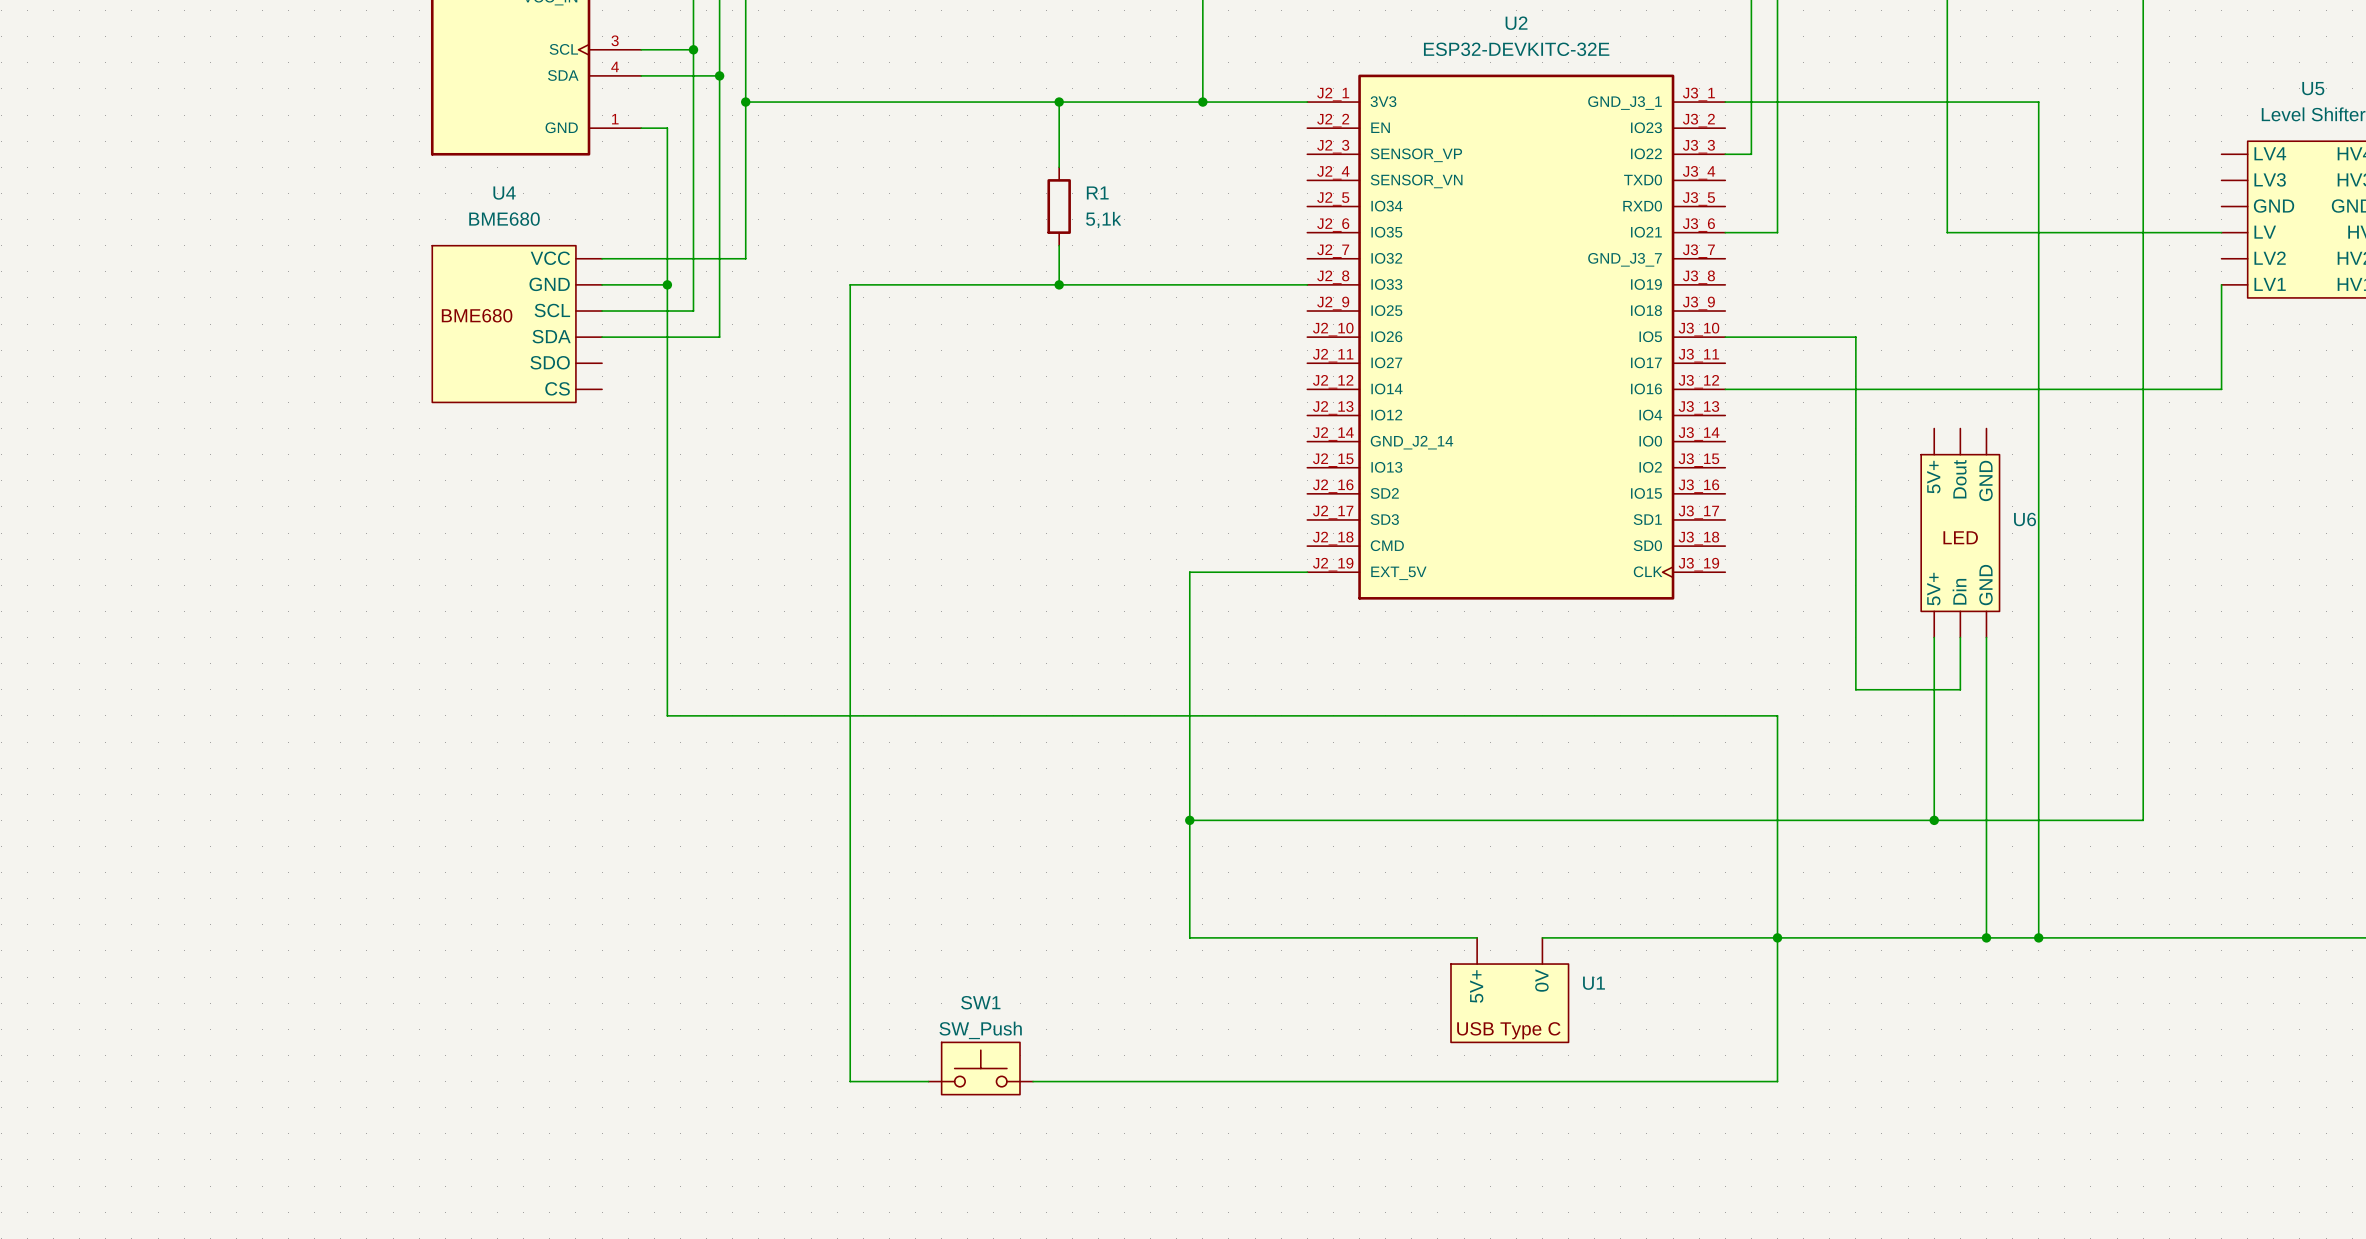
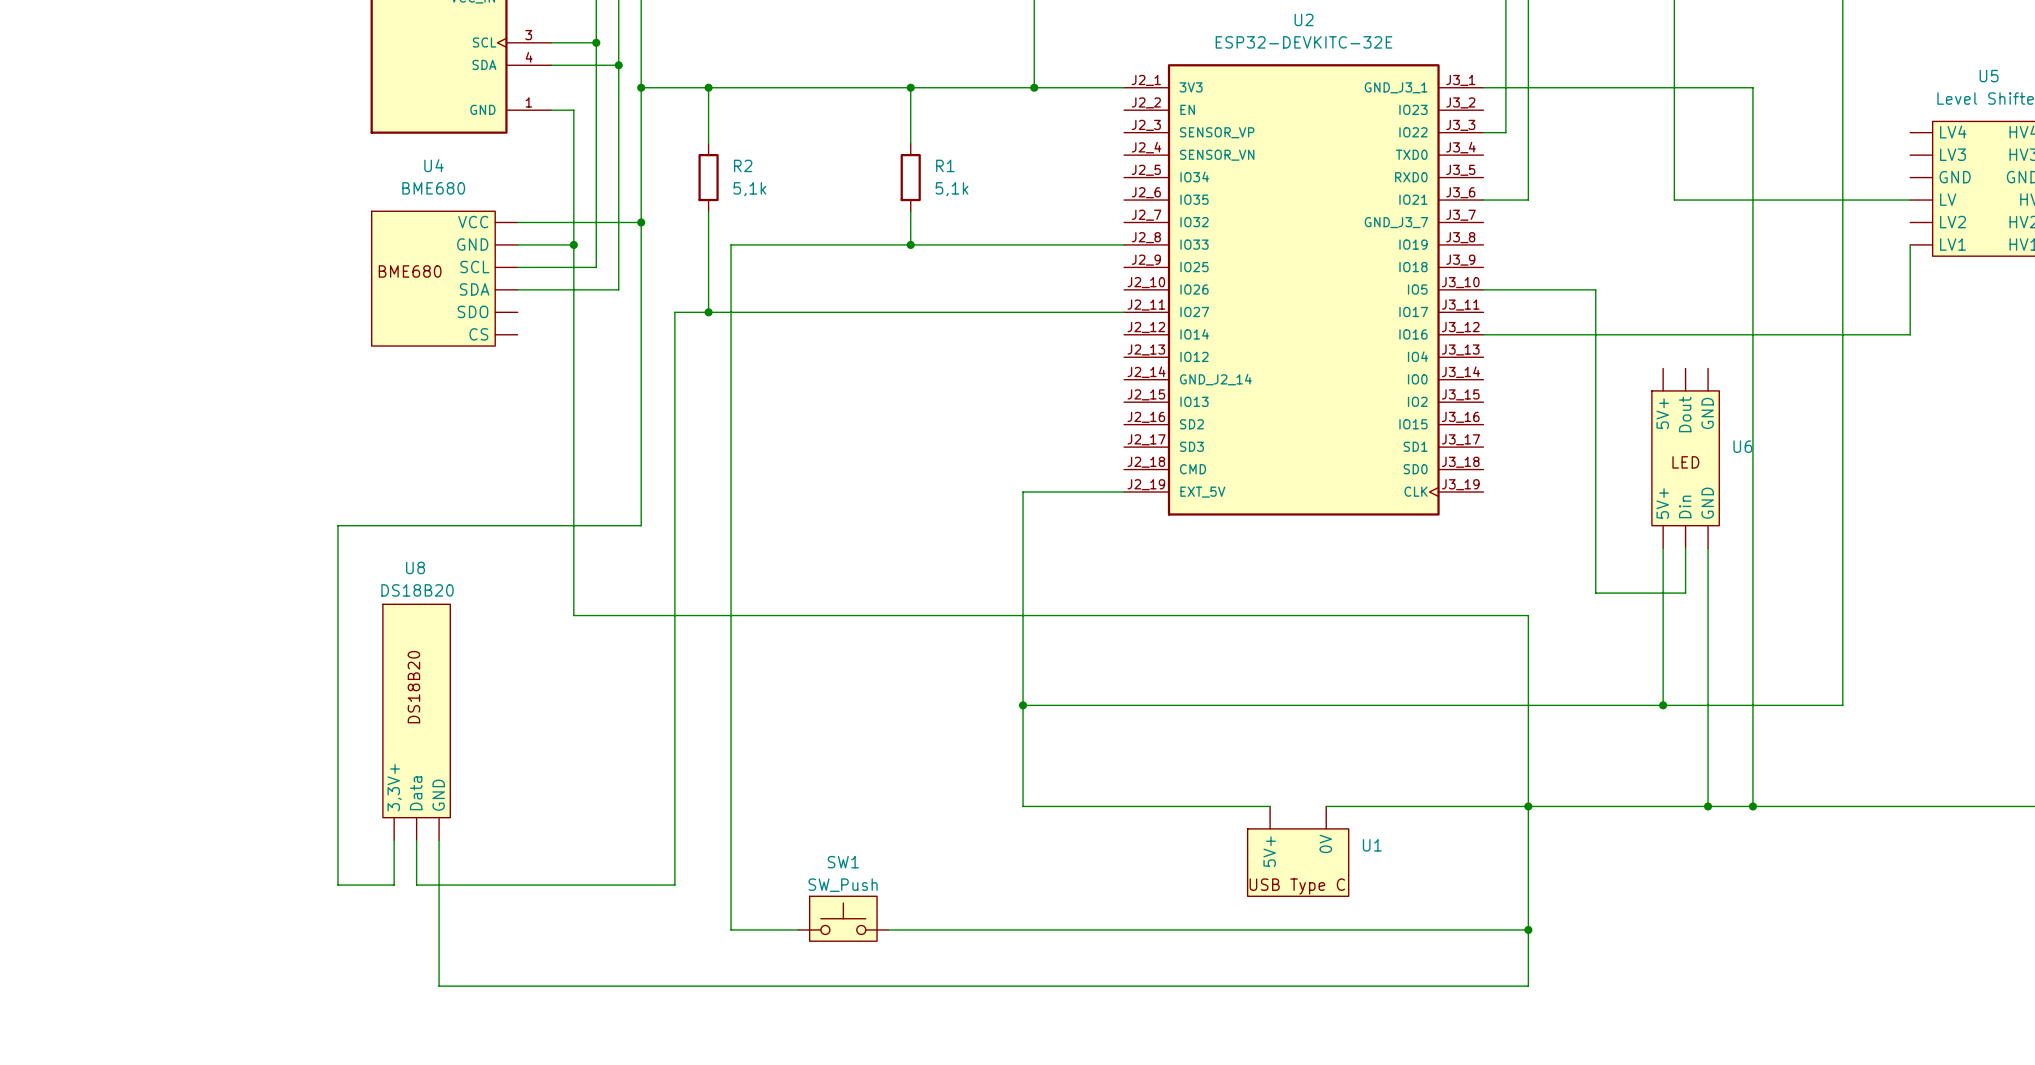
wire: none -> (708, 87) (708, 143)
junction: none -> (708, 87)
R2: none -> 5,1k (708, 177)
wire: none -> (708, 211) (708, 312)
wire: none -> (641, 222) (641, 525) (338, 525) (338, 885) (394, 885) (394, 840)
junction: none -> (641, 222)
junction: none -> (708, 312)
wire: none -> (1124, 312) (674, 312) (674, 885) (416, 885) (416, 840)
U8: none -> DS18B20 (416, 722)
wire: none -> (439, 840) (439, 986) (1528, 986) (1528, 929)
junction: none -> (1528, 929)

